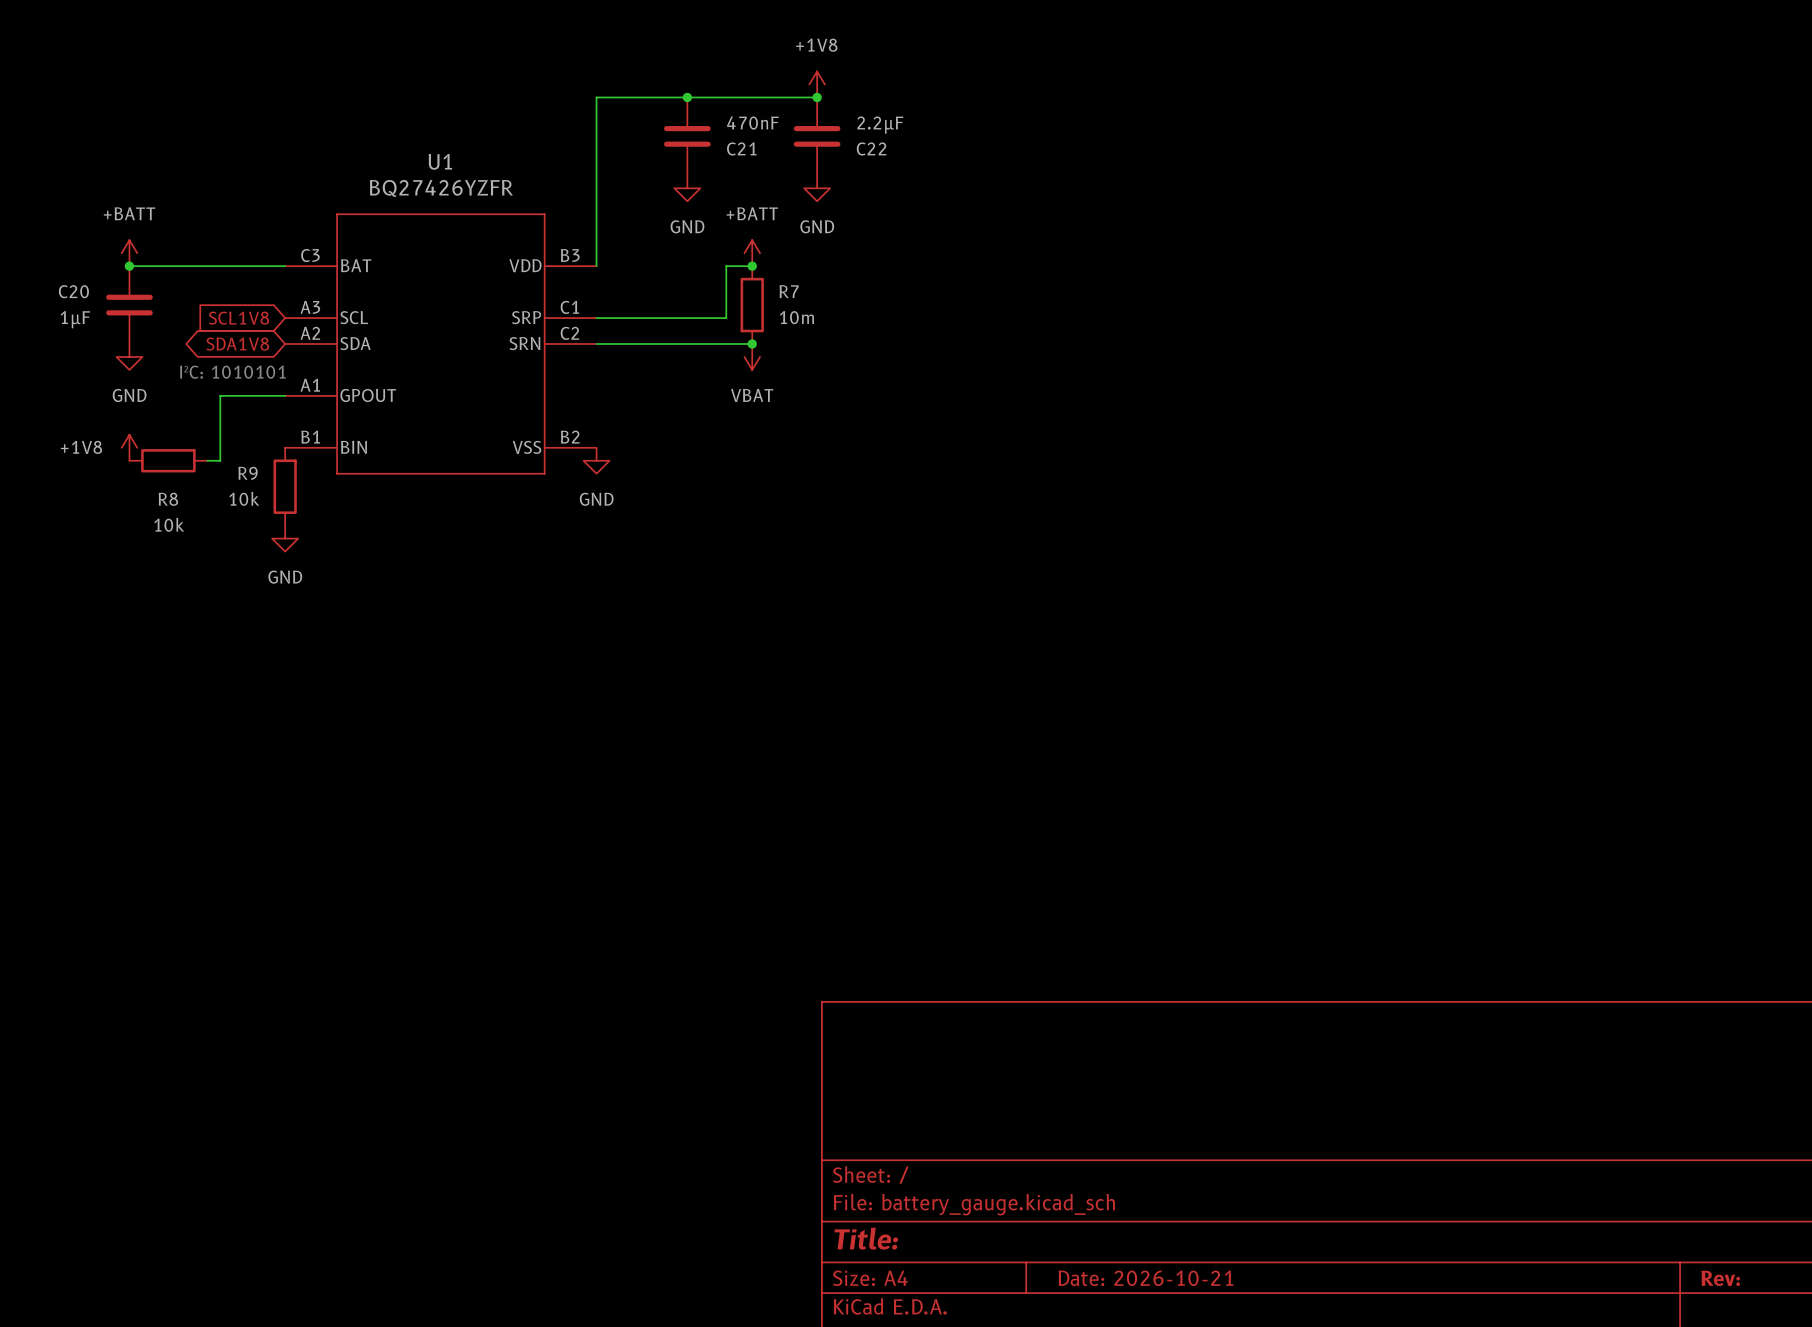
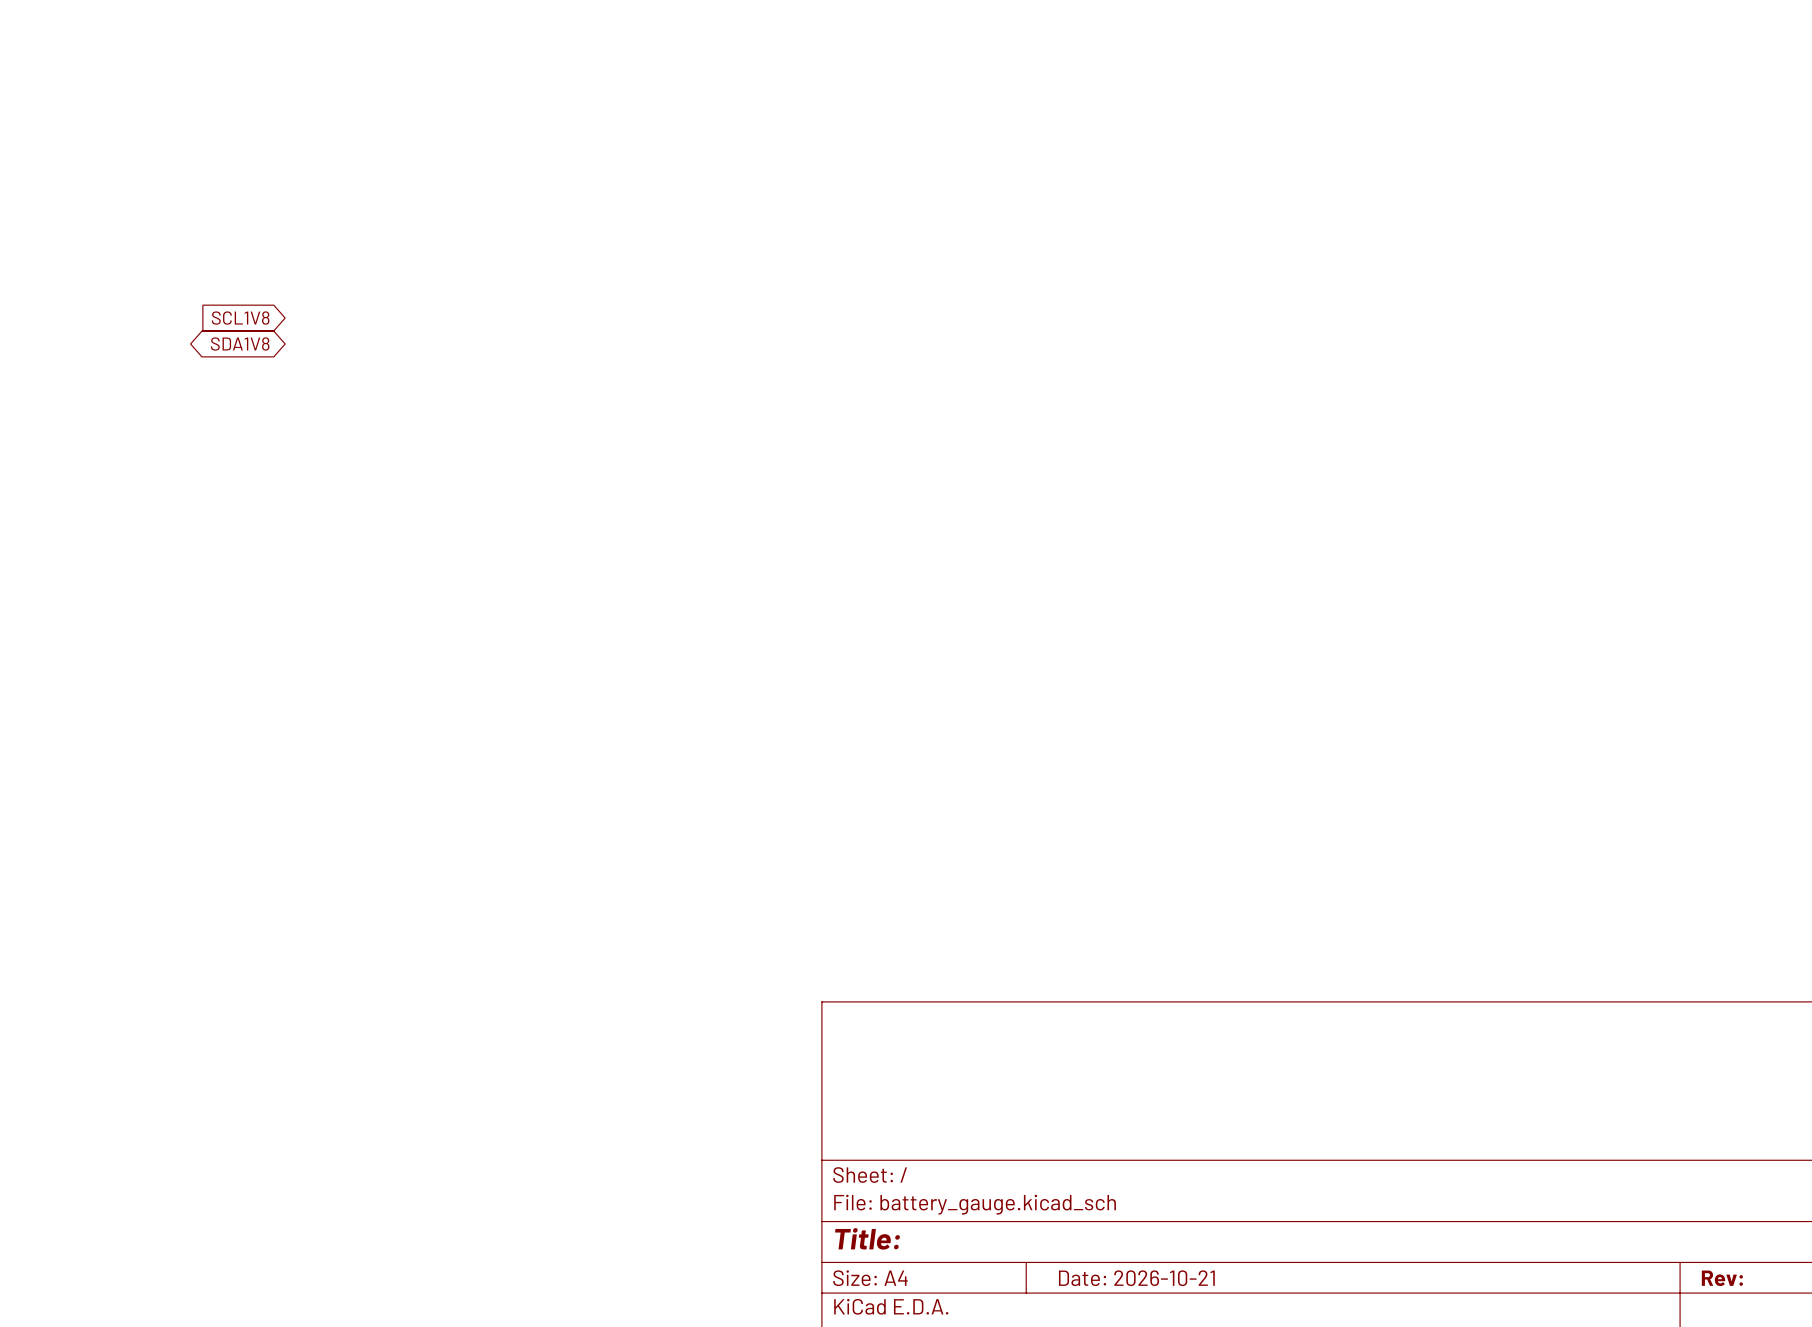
power symbol: +1V8 (817, 84) -> none
junction: (687, 97) -> none
wire: (817, 97) (596, 97) (596, 266) -> none
junction: (817, 97) -> none
C21: 470nF (687, 136) -> none
C22: 2.2µF (817, 136) -> none
power symbol: GND (687, 188) -> none
power symbol: GND (817, 188) -> none
power symbol: +BATT (129, 253) -> none
power symbol: +BATT (752, 253) -> none
wire: (129, 266) (285, 266) -> none
junction: (129, 266) -> none
wire: (752, 266) (726, 266) (726, 318) (596, 318) -> none
junction: (752, 266) -> none
C20: 1µF (129, 305) -> none
R7: 10m (752, 305) -> none
U1: BQ27426YZFR (440, 344) -> none
wire: (596, 344) (752, 344) -> none
junction: (752, 344) -> none
power symbol: GND (129, 356) -> none
power symbol: VBAT (752, 356) -> none
text: I²C: 1010101 (232, 372) -> none
wire: (285, 395) (220, 395) (220, 460) (207, 460) -> none
power symbol: +1V8 (129, 447) -> none
R8: 10k (168, 460) -> none
power symbol: GND (596, 460) -> none
R9: 10k (285, 486) -> none
power symbol: GND (285, 538) -> none

